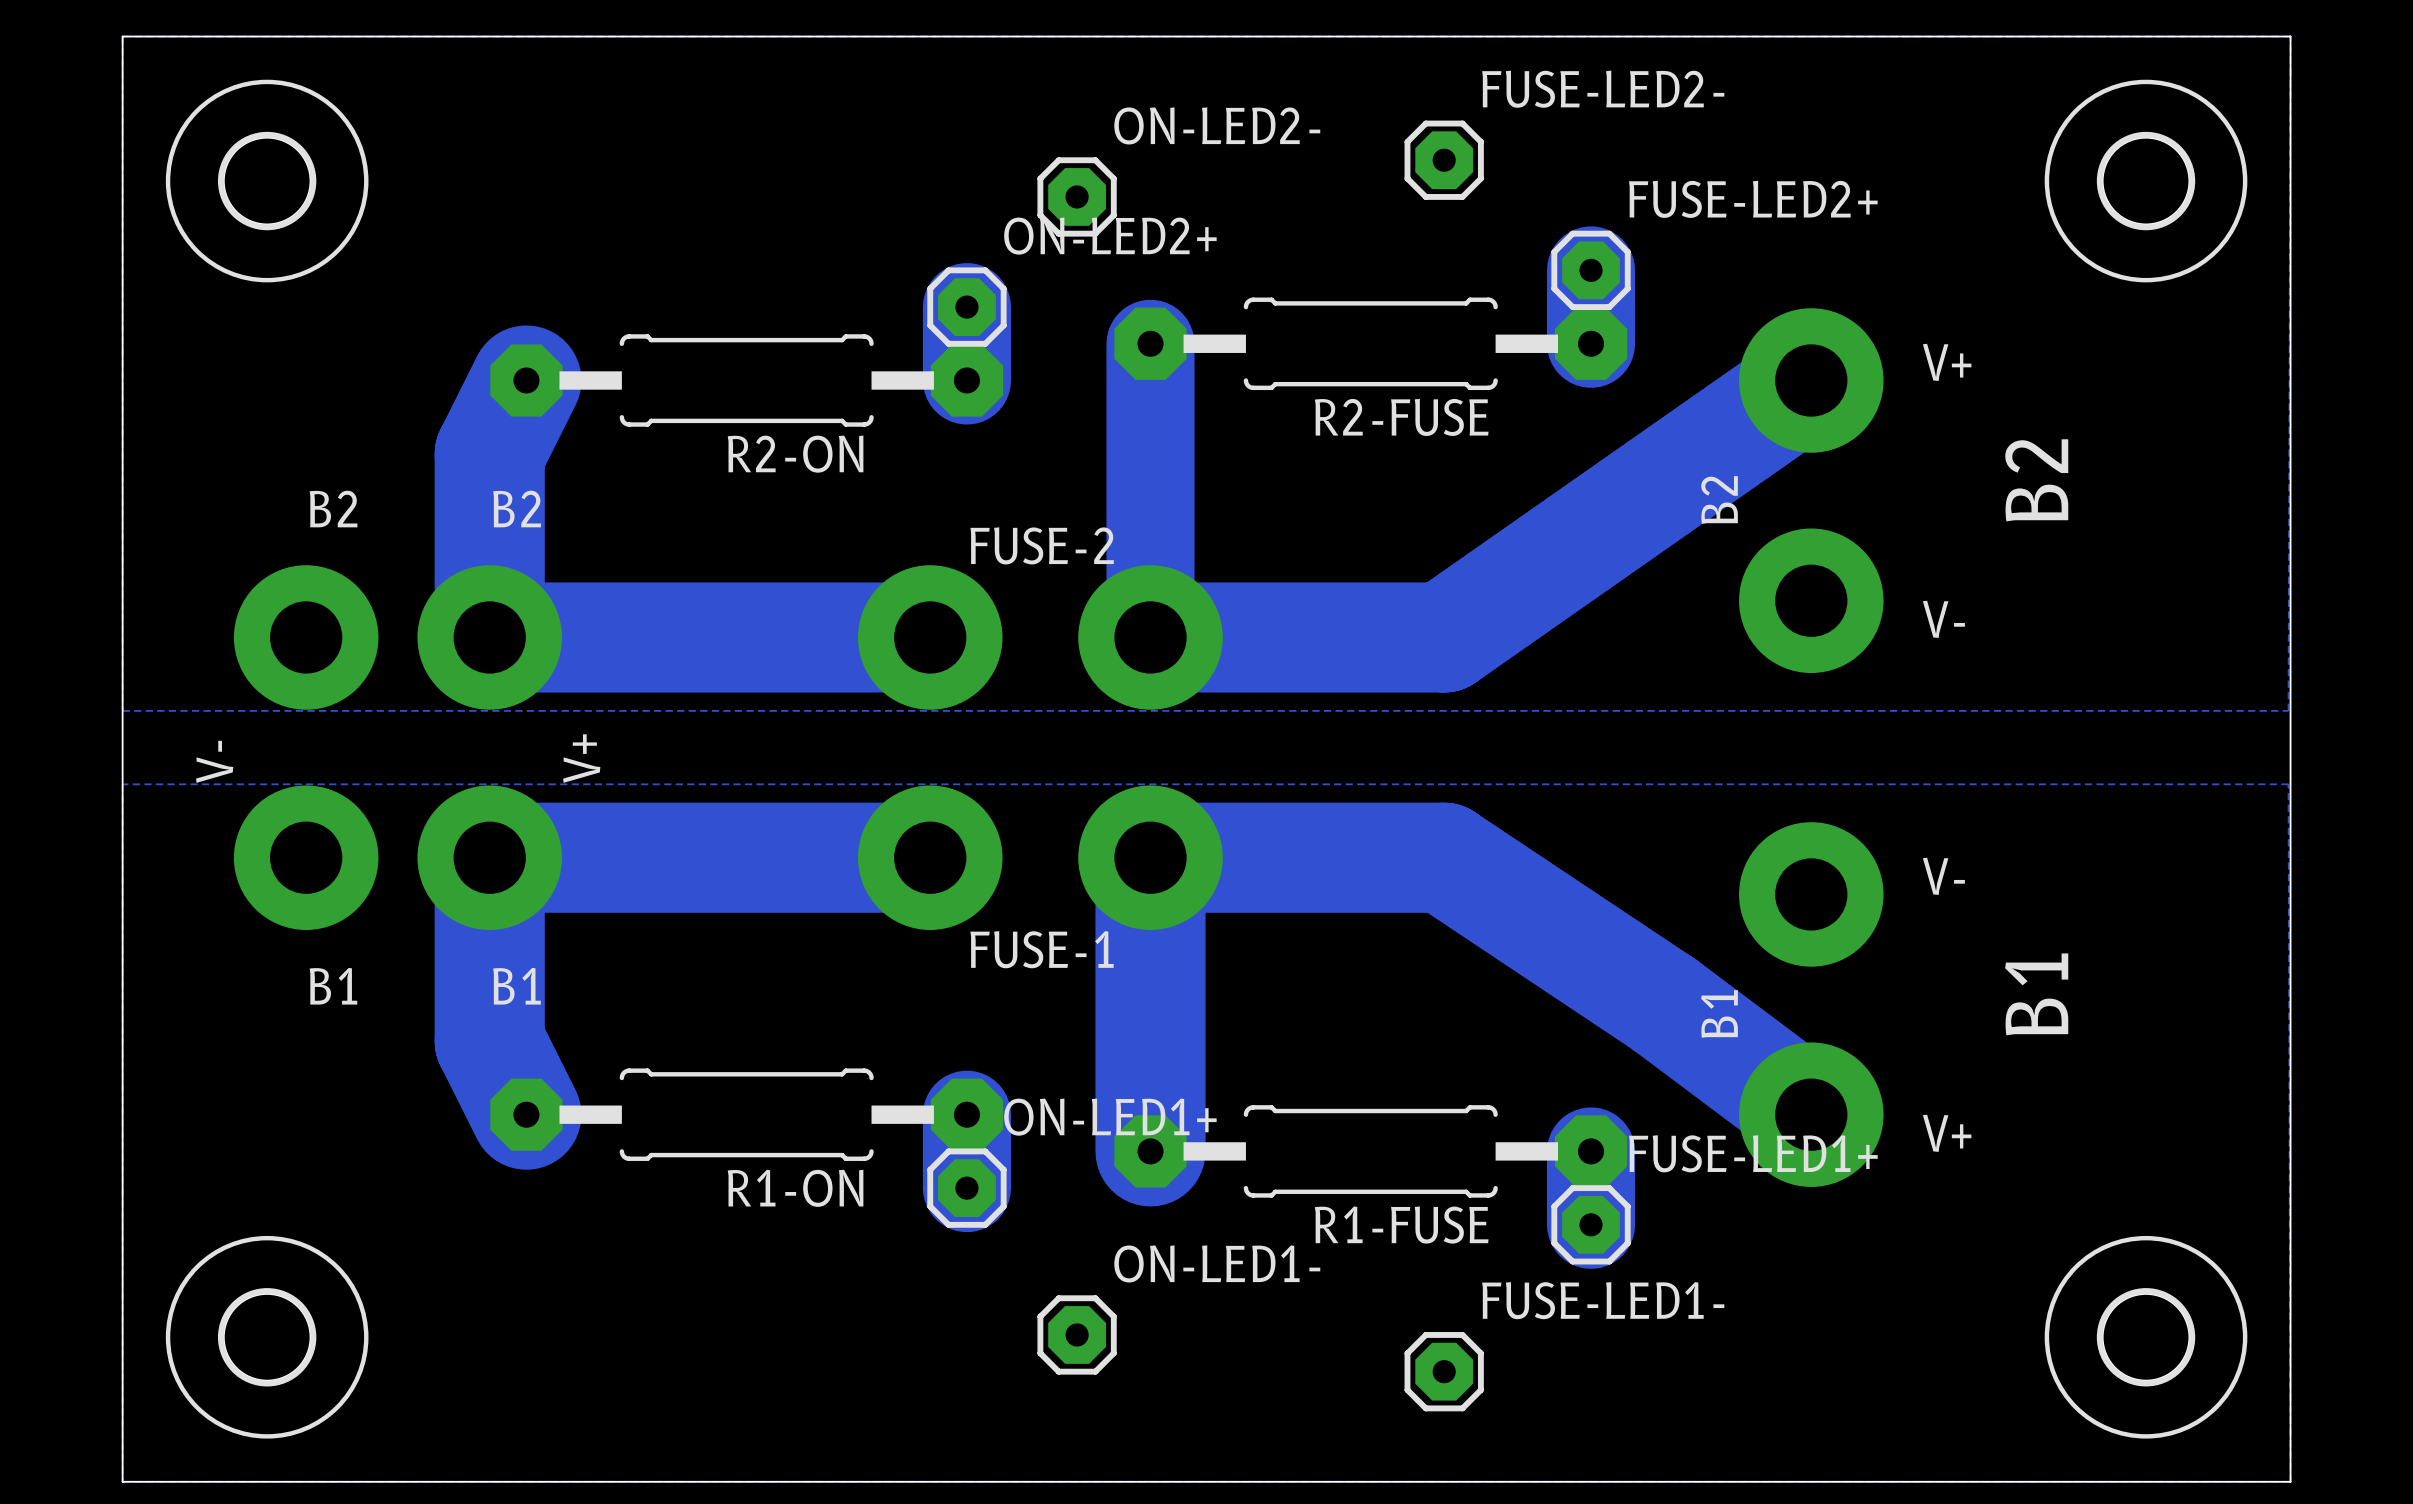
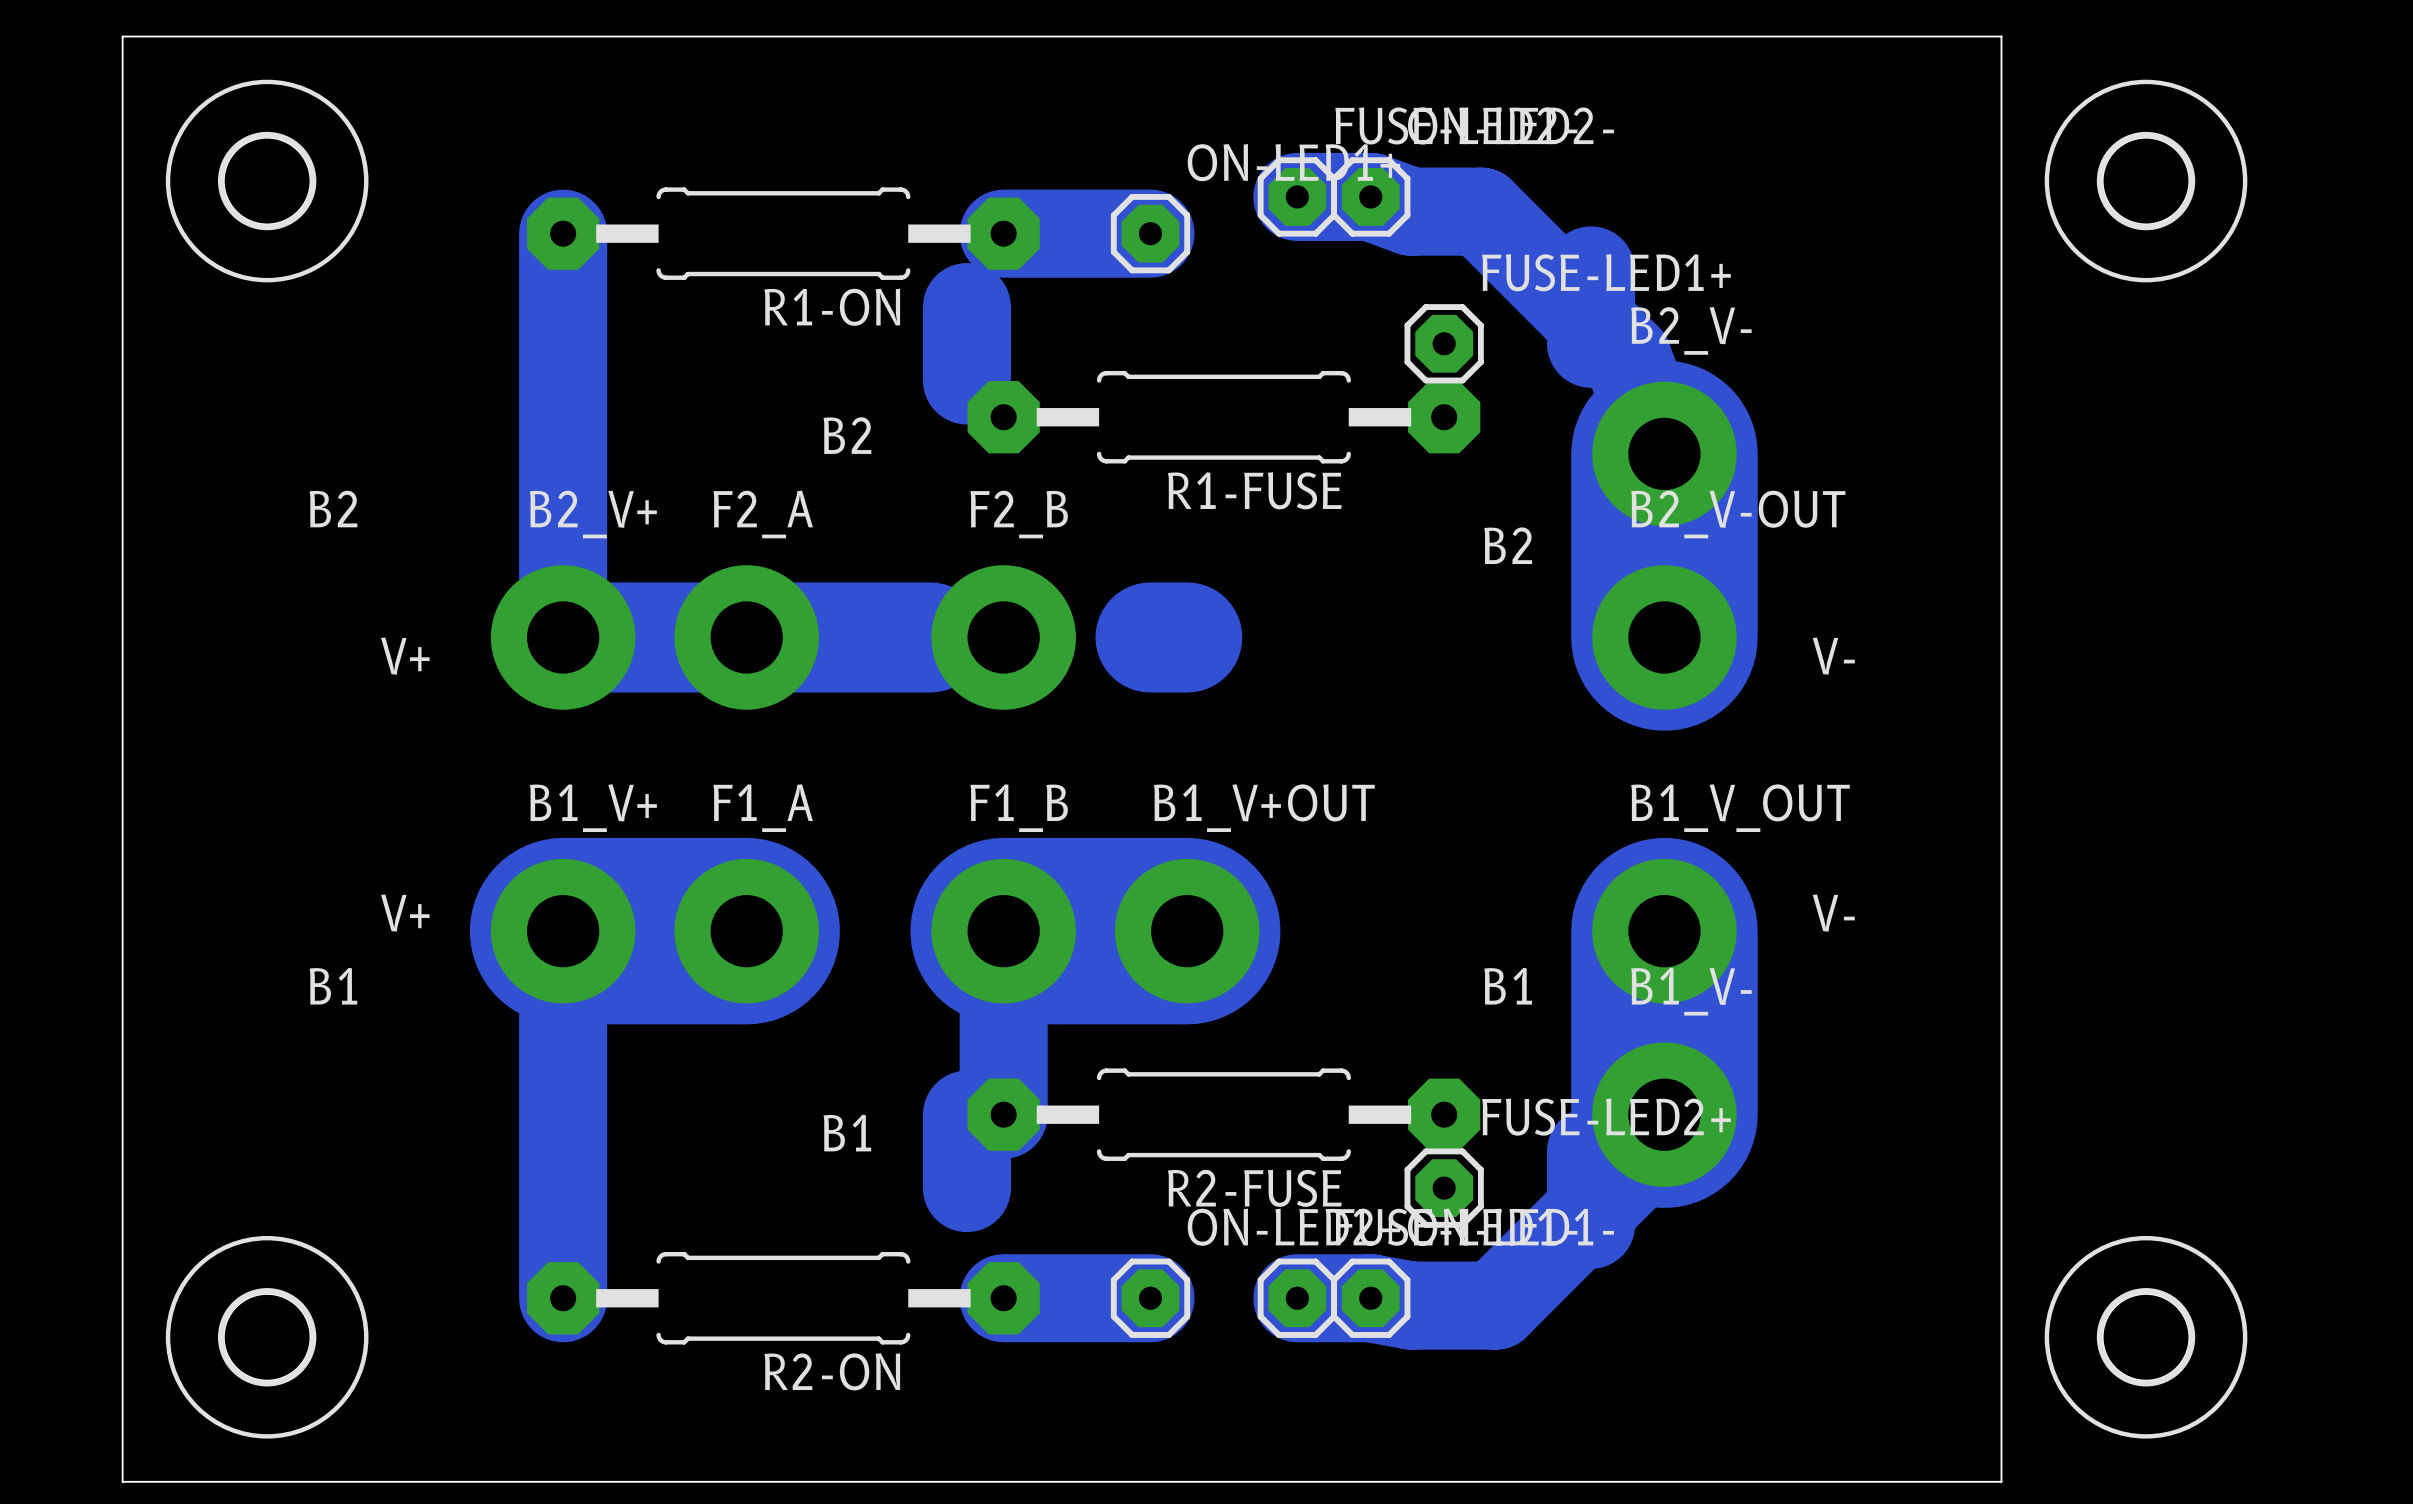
bottom zone outline: (122, 36) (122, 710) (2288, 710) (2290, 36) (122, 36) -> none
board edge: (2001, 36) (2290, 36) (2290, 1481) (2001, 1481) -> (2001, 36) (2001, 1481)
FUSE-LED2- position: (1444, 160) -> (1297, 196)
ON-LED2- position: (1077, 196) -> (1370, 196)
bottom track: none -> (1297, 196) (1370, 196) (1411, 211) (1480, 211) (1627, 358) (1664, 453) (1664, 637)
bottom track: none -> (1003, 233) (1150, 233)
FUSE-LED2+ position: (1591, 270) -> (1444, 1188)
ON-LED2+ position: (966, 307) -> (1150, 1298)
bottom track: (1150, 343) (1150, 637) (1187, 644) -> none
R2-FUSE position: (1370, 343) -> (1223, 1114)
text: V+ (1947, 362) -> none
bottom track: (526, 380) (489, 453) (489, 637) (563, 637) -> (563, 233) (563, 637)
R2-ON position: (746, 380) -> (783, 1298)
bottom track: (1811, 380) (1444, 637) (1187, 637) -> none
B2_V-: none -> (1664, 453)
text: B2 (2036, 480) -> none
B2: (1811, 490) -> none
text position: B2 (517, 509) -> B2 (847, 435)
text: none -> B2 (1508, 545)
text position: V- (1943, 619) -> V- (1833, 656)
B2_V+: none -> (563, 637)
F2_A: none -> (746, 637)
F2_B: none -> (1003, 637)
FUSE-2: (1040, 637) -> none
B2_V-OUT: none -> (1664, 637)
text: none -> V+ (405, 656)
V-: (306, 747) -> none
V+: (489, 747) -> none
bottom zone outline: (122, 784) (2288, 784) (2290, 1481) (122, 1481) (122, 784) -> none
bottom track: (930, 857) (489, 857) (489, 1041) (526, 1114) -> none
FUSE-1: (1040, 857) -> none
text position: V- (1943, 876) -> V- (1833, 913)
text: none -> V+ (405, 913)
B1_V+: none -> (563, 931)
bottom track: none -> (746, 931) (563, 931) (563, 1298)
F1_A: none -> (746, 931)
F1_B: none -> (1003, 931)
bottom track: none -> (1187, 931) (1003, 931) (1003, 1114)
B1_V+OUT: none -> (1187, 931)
bottom track: none -> (1664, 931) (1664, 1136) (1495, 1305) (1411, 1305) (1370, 1298) (1297, 1298)
B1_V_OUT: none -> (1664, 931)
text position: B1 (517, 986) -> B1 (847, 1133)
text: none -> B1 (1508, 986)
text: B1 (2036, 994) -> none
B1: (1811, 1004) -> none
R1-ON position: (746, 1114) -> (783, 233)
B1_V-: none -> (1664, 1114)
bottom track: (1811, 1114) (1664, 1004) (1444, 857) (1150, 857) (1150, 1151) -> none
text: V+ (1947, 1133) -> none
R1-FUSE position: (1370, 1151) -> (1223, 417)
ON-LED1+ position: (966, 1188) -> (1150, 233)
FUSE-LED1+ position: (1591, 1224) -> (1444, 343)
bottom track: none -> (1003, 1298) (1150, 1298)
ON-LED1- position: (1077, 1334) -> (1370, 1298)
FUSE-LED1- position: (1444, 1371) -> (1297, 1298)

